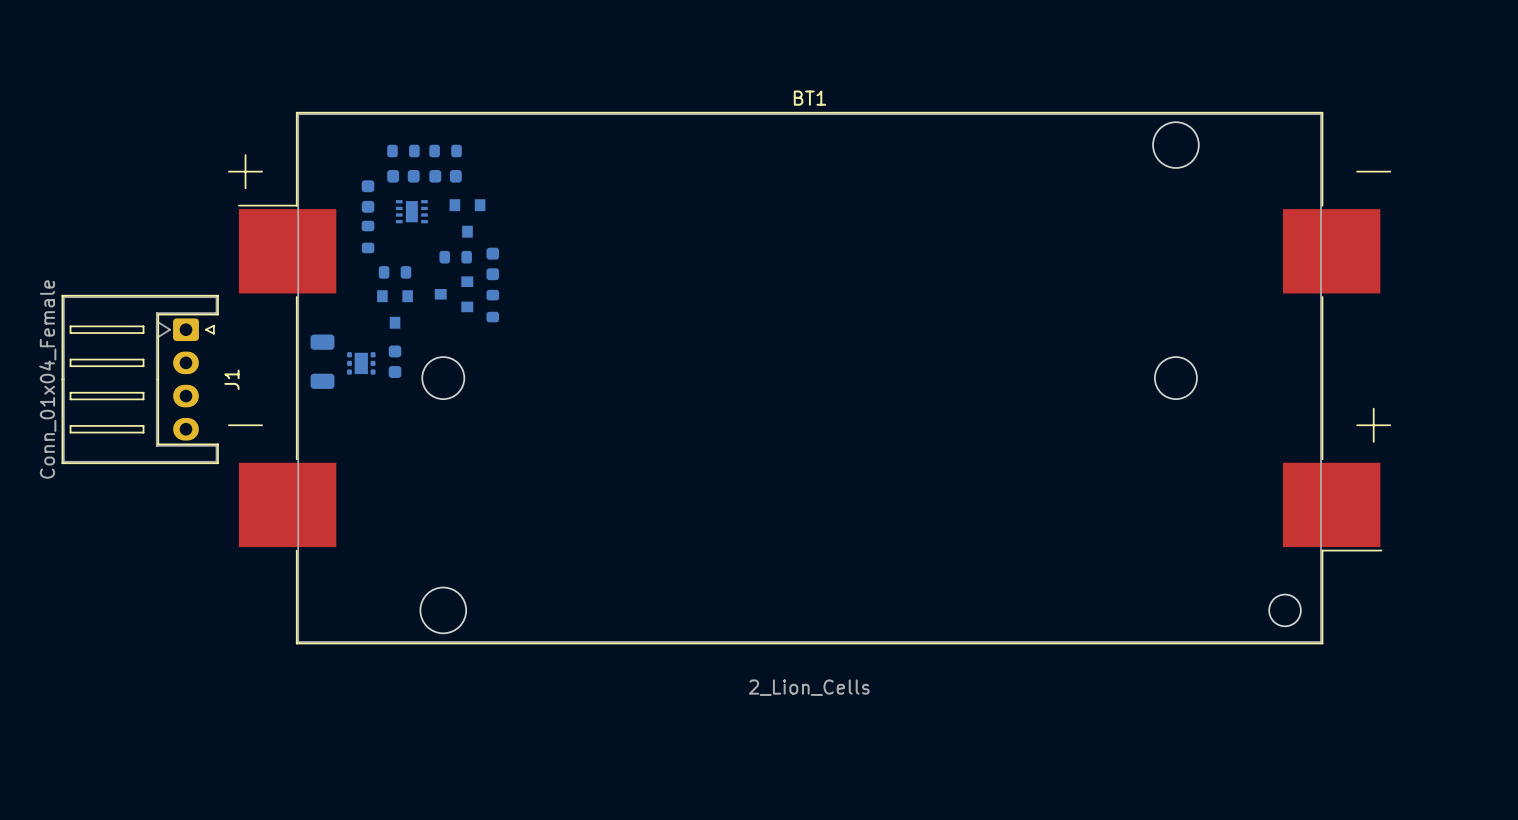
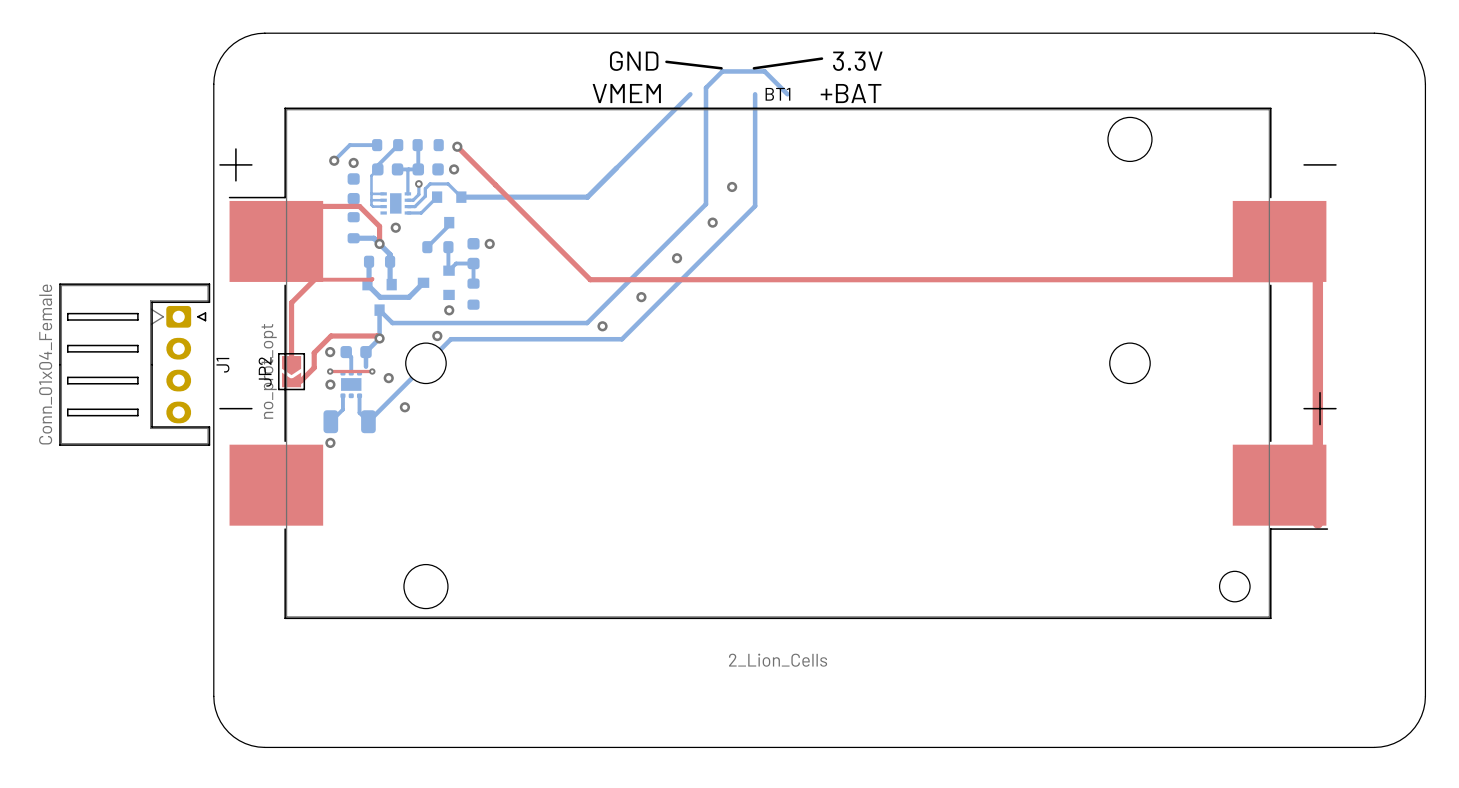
board edge: none -> (264, 33) (1374, 33) (1387, 34) (1399, 40) (1410, 48) (1418, 58) (1423, 71) (1425, 84) (1425, 696) (1423, 709) (1418, 721) (1410, 732) (1399, 740) (1387, 745) (1374, 747) (264, 747) (251, 745) (239, 740) (228, 732) (220, 721) (215, 709) (213, 696) (213, 84) (217, 64) (228, 48) (245, 37) (264, 33)
line: none -> (821, 58) (753, 68)
text: none -> GND (634, 61)
text: none -> 3.3V (857, 61)
line: none -> (666, 61) (721, 68)
text: none -> VMEM (626, 93)
text: none -> +BAT (851, 93)
bottom track: none -> (690, 94) (587, 197) (461, 197) (448, 183) (430, 183) (425, 188) (425, 196) (414, 206) (407, 206)
bottom track: none -> (755, 94) (755, 206) (621, 339) (450, 339) (368, 421) (359, 412) (359, 395)
bottom track: none -> (787, 94) (764, 71) (722, 71) (705, 87) (705, 204) (587, 323) (392, 323) (379, 310) (379, 338) (365, 352) (365, 366)
bottom track: none -> (377, 145) (349, 145) (334, 160)
bottom track: none -> (398, 145) (377, 165) (377, 169) (371, 175) (371, 205) (383, 206)
bottom track: none -> (417, 145) (418, 169) (397, 169)
top track: none -> (457, 146) (590, 279) (1317, 279) (1317, 523)
via: none -> (457, 146)
via: none -> (334, 160)
via: none -> (353, 162)
bottom track: none -> (408, 169) (407, 193)
via: none -> (454, 169)
bottom track: none -> (418, 183) (418, 194) (413, 200) (407, 200)
via: none -> (418, 183)
via: none -> (732, 186)
bottom track: none -> (371, 193) (383, 193)
bottom track: none -> (437, 197) (421, 212) (407, 212)
bottom track: none -> (371, 200) (383, 200)
top track: none -> (297, 206) (359, 206) (379, 226) (379, 243)
bottom track: none -> (449, 222) (449, 225) (427, 247)
via: none -> (712, 222)
via: none -> (395, 227)
bottom track: none -> (353, 238) (373, 238) (390, 254) (390, 283) (391, 284)
via: none -> (379, 243)
via: none -> (489, 243)
bottom track: none -> (448, 247) (448, 270) (456, 263) (473, 263) (473, 283)
via: none -> (677, 258)
bottom track: none -> (369, 261) (367, 284) (380, 297) (408, 297) (423, 282)
top track: none -> (372, 278) (314, 279) (291, 302) (291, 362)
via: none -> (641, 297)
via: none -> (449, 310)
via: none -> (602, 326)
via: none -> (437, 336)
part footprint: [347, 352, 376, 375] -> [340, 346, 372, 359]
top track: none -> (379, 338) (377, 336) (331, 336) (314, 352) (314, 367) (301, 380) (291, 380)
via: none -> (379, 338)
part rotation: 0° (322, 361) -> 90° clockwise (349, 421)
part position: (322, 361) -> (349, 421)
part: (395, 361) -> none
via: none -> (330, 352)
bottom track: none -> (346, 352) (351, 357) (351, 373)
JP2: none -> no_prot_opt (291, 371)
top track: none -> (330, 371) (372, 371)
via: none -> (330, 371)
via: none -> (372, 371)
via: none -> (388, 378)
via: none -> (330, 384)
part: none -> (351, 384)
bottom track: none -> (342, 395) (342, 409) (330, 421)
via: none -> (404, 407)
via: none -> (330, 442)

